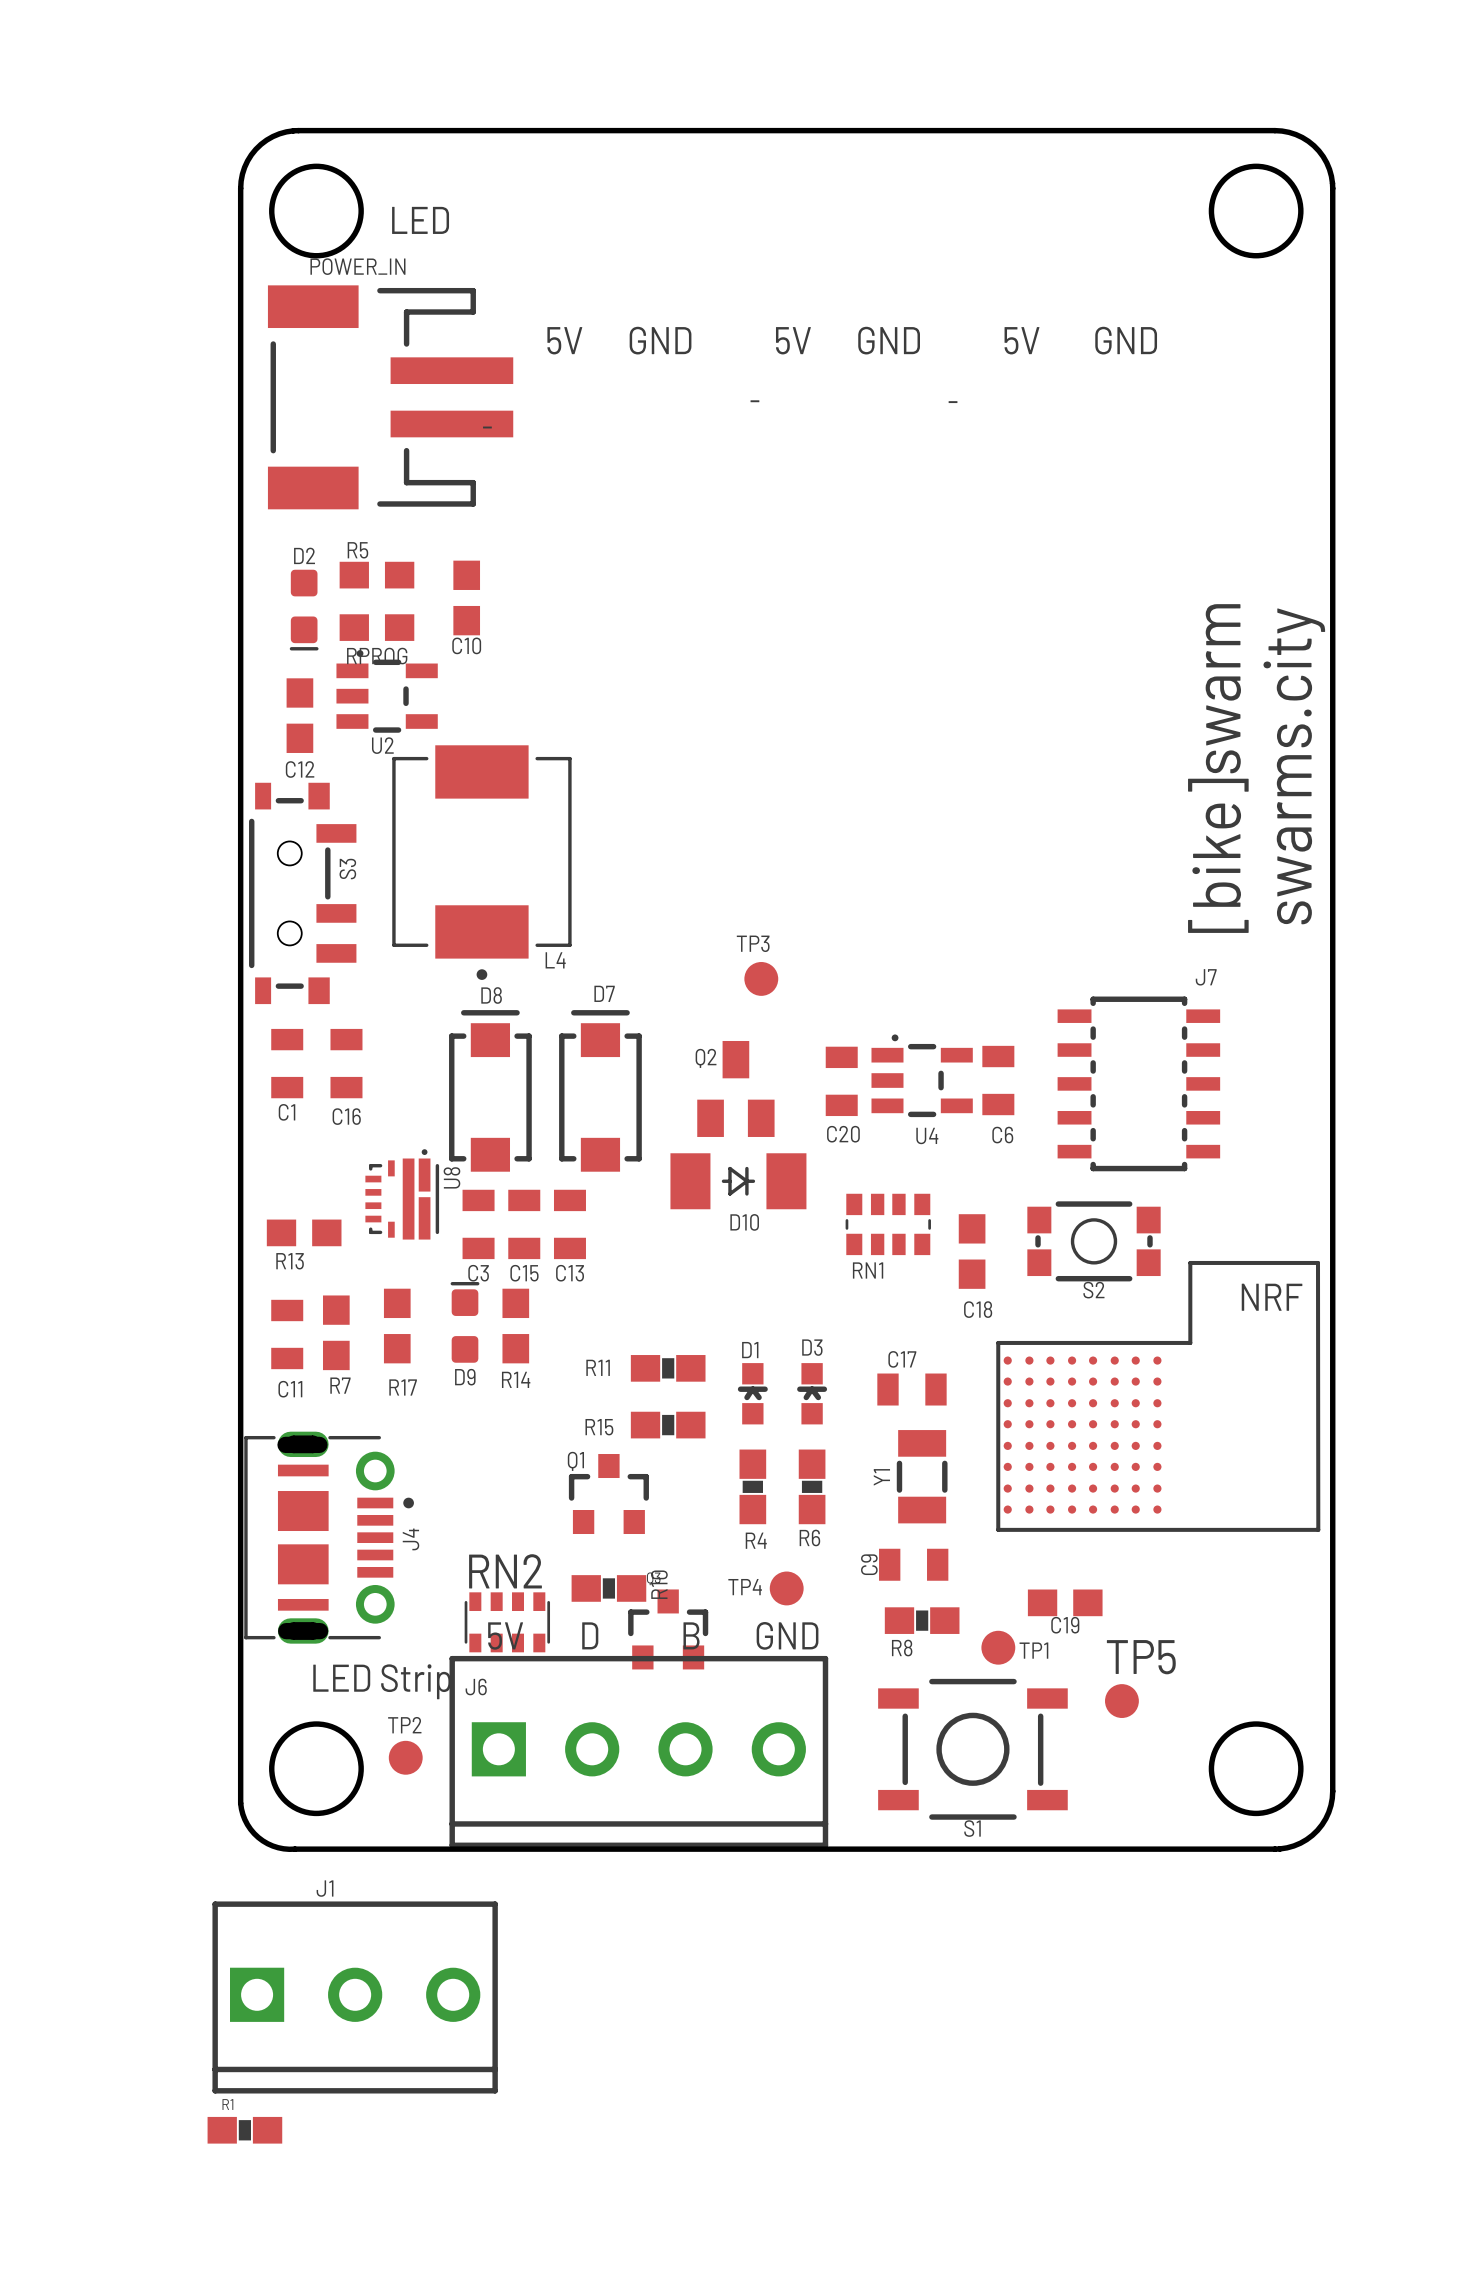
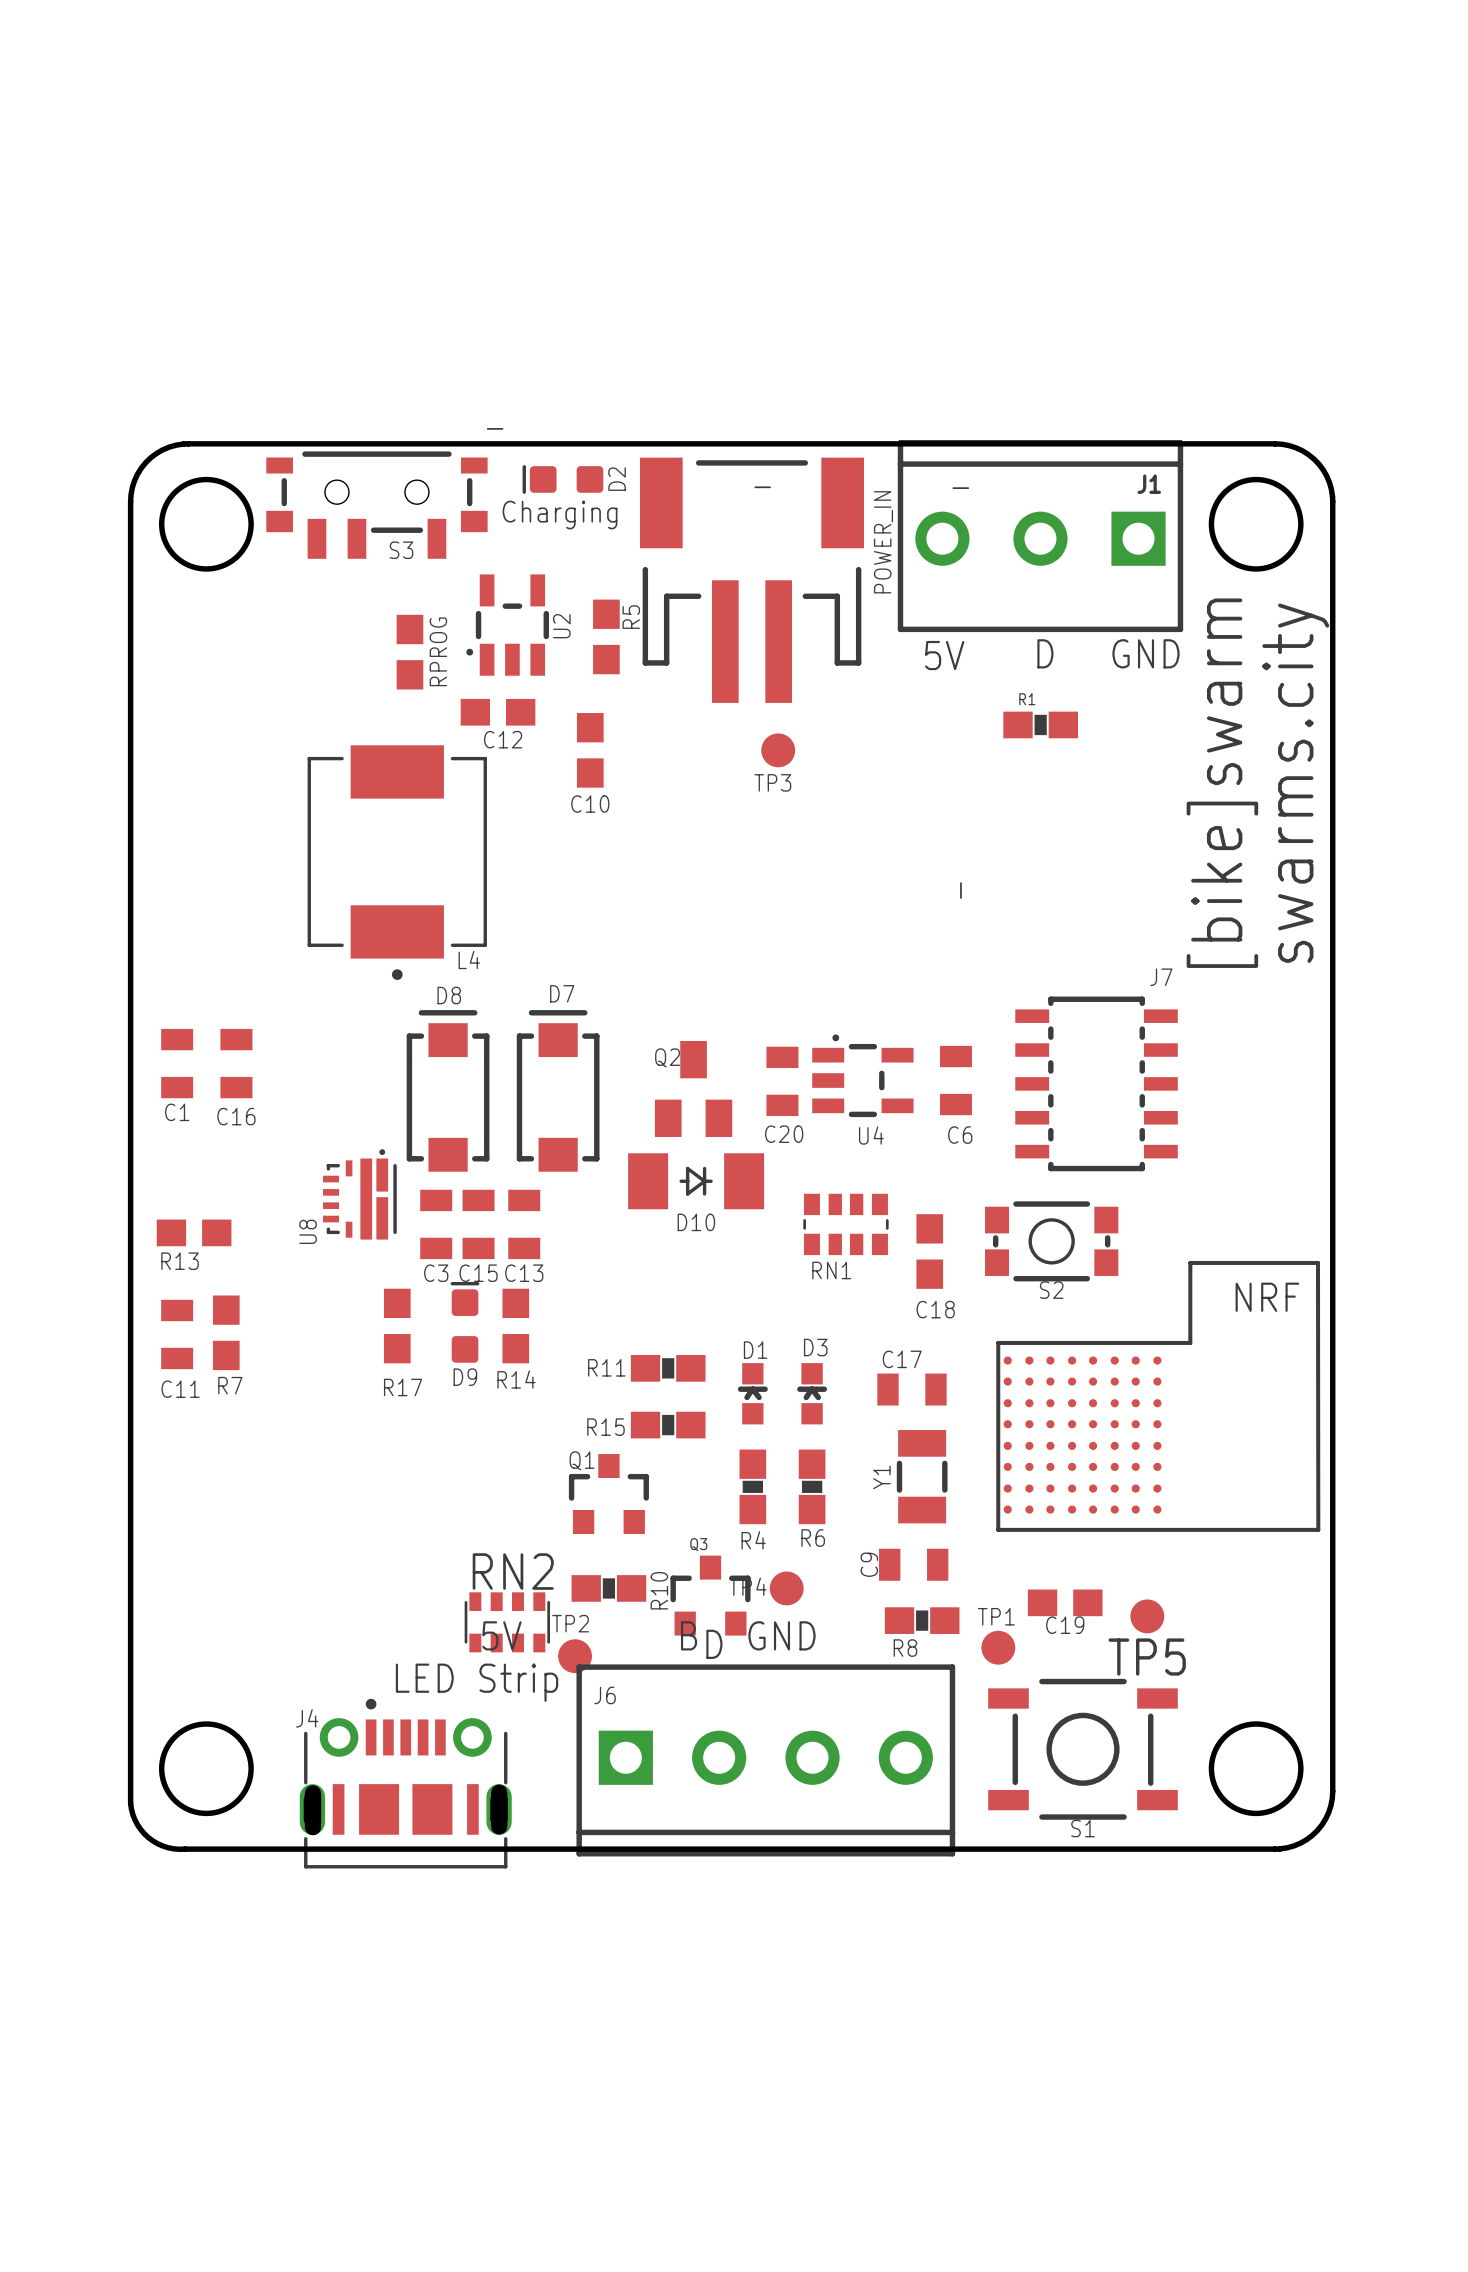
round board edge position: (316, 211) -> (206, 524)
round board edge position: (1256, 211) -> (1256, 524)
text: LED (420, 220) -> none
text: 5V (564, 340) -> none
text: GND (660, 340) -> none
text: 5V (793, 340) -> none
text: GND (889, 340) -> none
text: 5V (1022, 340) -> none
text: GND (1126, 340) -> none
POWER_IN rotation: 0° (390, 397) -> 90° clockwise (751, 580)
POWER_IN position: (390, 397) -> (751, 580)
text position: - (754, 401) -> - (762, 487)
text position: - (953, 402) -> - (960, 488)
board edge: (1332, 501) (1332, 183) (1329, 169) (1323, 156) (1313, 145) (1295, 134) (1274, 130) (298, 130) (286, 131) (272, 136) (260, 144) (251, 154) (242, 174) (240, 188) (240, 1803) (247, 1824) (258, 1837) (278, 1847) (294, 1849) -> (1332, 501) (1331, 489) (1326, 476) (1313, 459) (1295, 447) (1274, 443) (188, 443) (176, 445) (162, 449) (150, 457) (141, 468) (132, 487) (130, 501) (130, 1803) (134, 1819) (144, 1833) (152, 1840) (168, 1847) (294, 1849)
text: none -> Charging (560, 515)
R5 rotation: 0° (376, 575) -> 90° clockwise (606, 636)
R5 position: (376, 575) -> (606, 636)
C10 position: (466, 597) -> (590, 750)
D2 rotation: 0° (304, 610) -> 90° clockwise (562, 479)
D2 position: (304, 610) -> (562, 479)
RPROG rotation: 0° (376, 627) -> 90° clockwise (409, 652)
C10 name position: C10 (466, 645) -> C10 (590, 804)
text: none -> D (1045, 653)
text: none -> GND (1146, 653)
text: none -> 5V (944, 655)
U2 rotation: 0° (387, 691) -> 90° counterclockwise (507, 625)
U2 position: (387, 691) -> (507, 625)
C12 rotation: 0° (299, 715) -> 90° clockwise (498, 712)
C12 position: (299, 715) -> (498, 712)
text position: swarms.city (1294, 766) -> swarms.city (1295, 783)
text position: [bike]swarm (1218, 768) -> [bike]swarm (1222, 783)
L4 position: (481, 862) -> (397, 862)
text: none -> - (960, 890)
S3 rotation: 0° (302, 893) -> 90° clockwise (376, 505)
S3 position: (302, 893) -> (376, 505)
TP3 name position: TP3 (753, 943) -> TP3 (772, 782)
TP3 position: (761, 978) -> (778, 750)
C1 position: (287, 1063) -> (177, 1063)
C16 position: (346, 1063) -> (236, 1063)
U4 position: (922, 1075) -> (862, 1075)
C6 position: (998, 1080) -> (956, 1080)
C20 position: (841, 1081) -> (782, 1081)
J7 position: (1138, 1083) -> (1096, 1083)
Q2 position: (735, 1088) -> (693, 1088)
D8 position: (490, 1090) -> (448, 1090)
D7 position: (600, 1090) -> (558, 1090)
U8 name position: U8 (451, 1177) -> U8 (308, 1231)
D10 position: (738, 1181) -> (696, 1181)
U8 position: (402, 1194) -> (359, 1194)
C3: none -> (436, 1224)
C13: (569, 1224) -> none
RN1 position: (888, 1224) -> (845, 1224)
R13 position: (304, 1232) -> (194, 1232)
S2 position: (1094, 1241) -> (1051, 1241)
C18 position: (972, 1251) -> (929, 1251)
C3 name: C3 (478, 1273) -> C15 (478, 1273)
C15 name: C15 (524, 1273) -> C13 (524, 1273)
R7 position: (336, 1332) -> (226, 1332)
C11 position: (287, 1334) -> (177, 1334)
J4 rotation: 0° (329, 1537) -> 90° counterclockwise (405, 1783)
J4 position: (329, 1537) -> (405, 1783)
J4 name position: J4 (410, 1539) -> J4 (307, 1718)
Q3 position: (668, 1629) -> (710, 1595)
text position: D (590, 1635) -> D (714, 1644)
TP1 name position: TP1 (1033, 1650) -> TP1 (996, 1616)
text position: LED Strip (382, 1681) -> LED Strip (477, 1682)
TP5 position: (1121, 1701) -> (1147, 1616)
S1 position: (972, 1749) -> (1083, 1749)
J6 position: (638, 1751) -> (765, 1760)
TP2 position: (405, 1757) -> (575, 1656)
round board edge position: (316, 1768) -> (206, 1768)
J1 name position: J1 (325, 1888) -> J1 (1149, 484)
J1 rotation: 0° (355, 1997) -> 180° (1040, 536)
J1 position: (355, 1997) -> (1040, 536)
R1 position: (244, 2130) -> (1040, 724)

